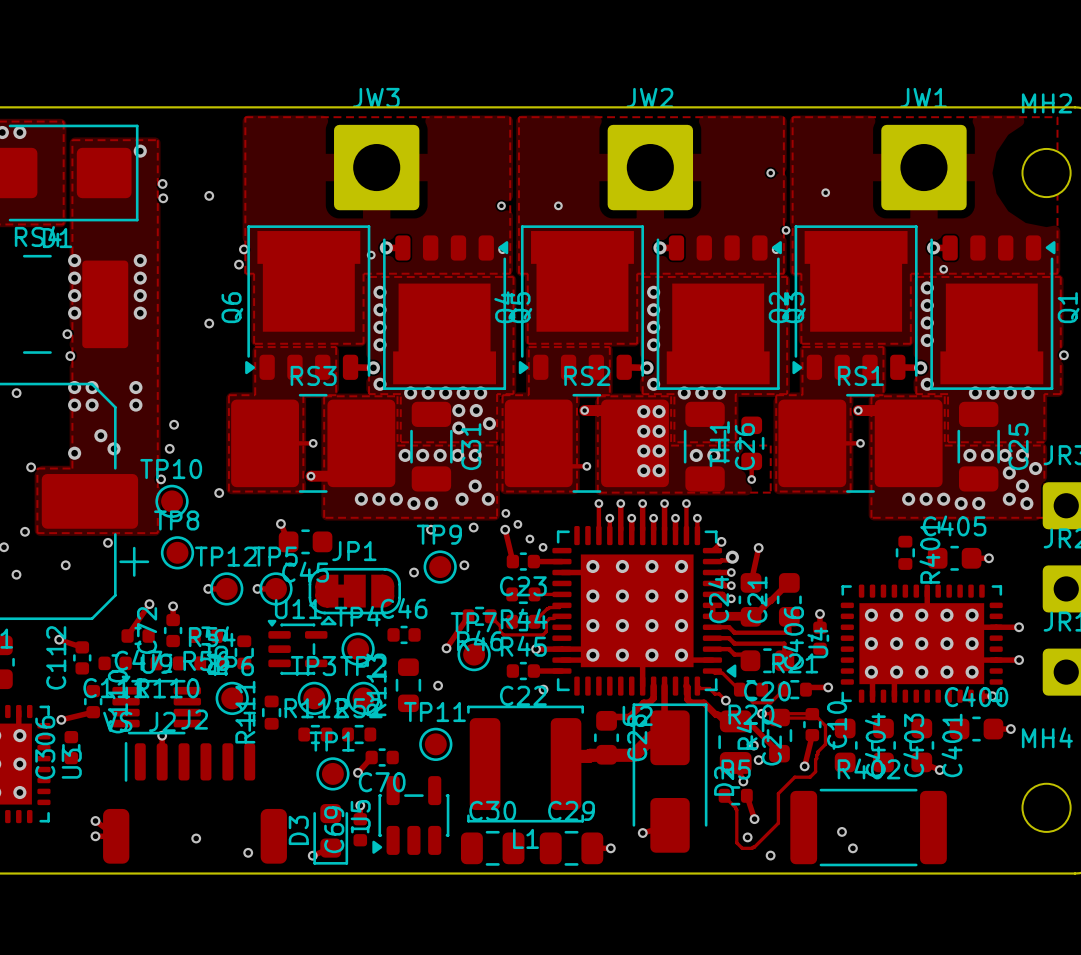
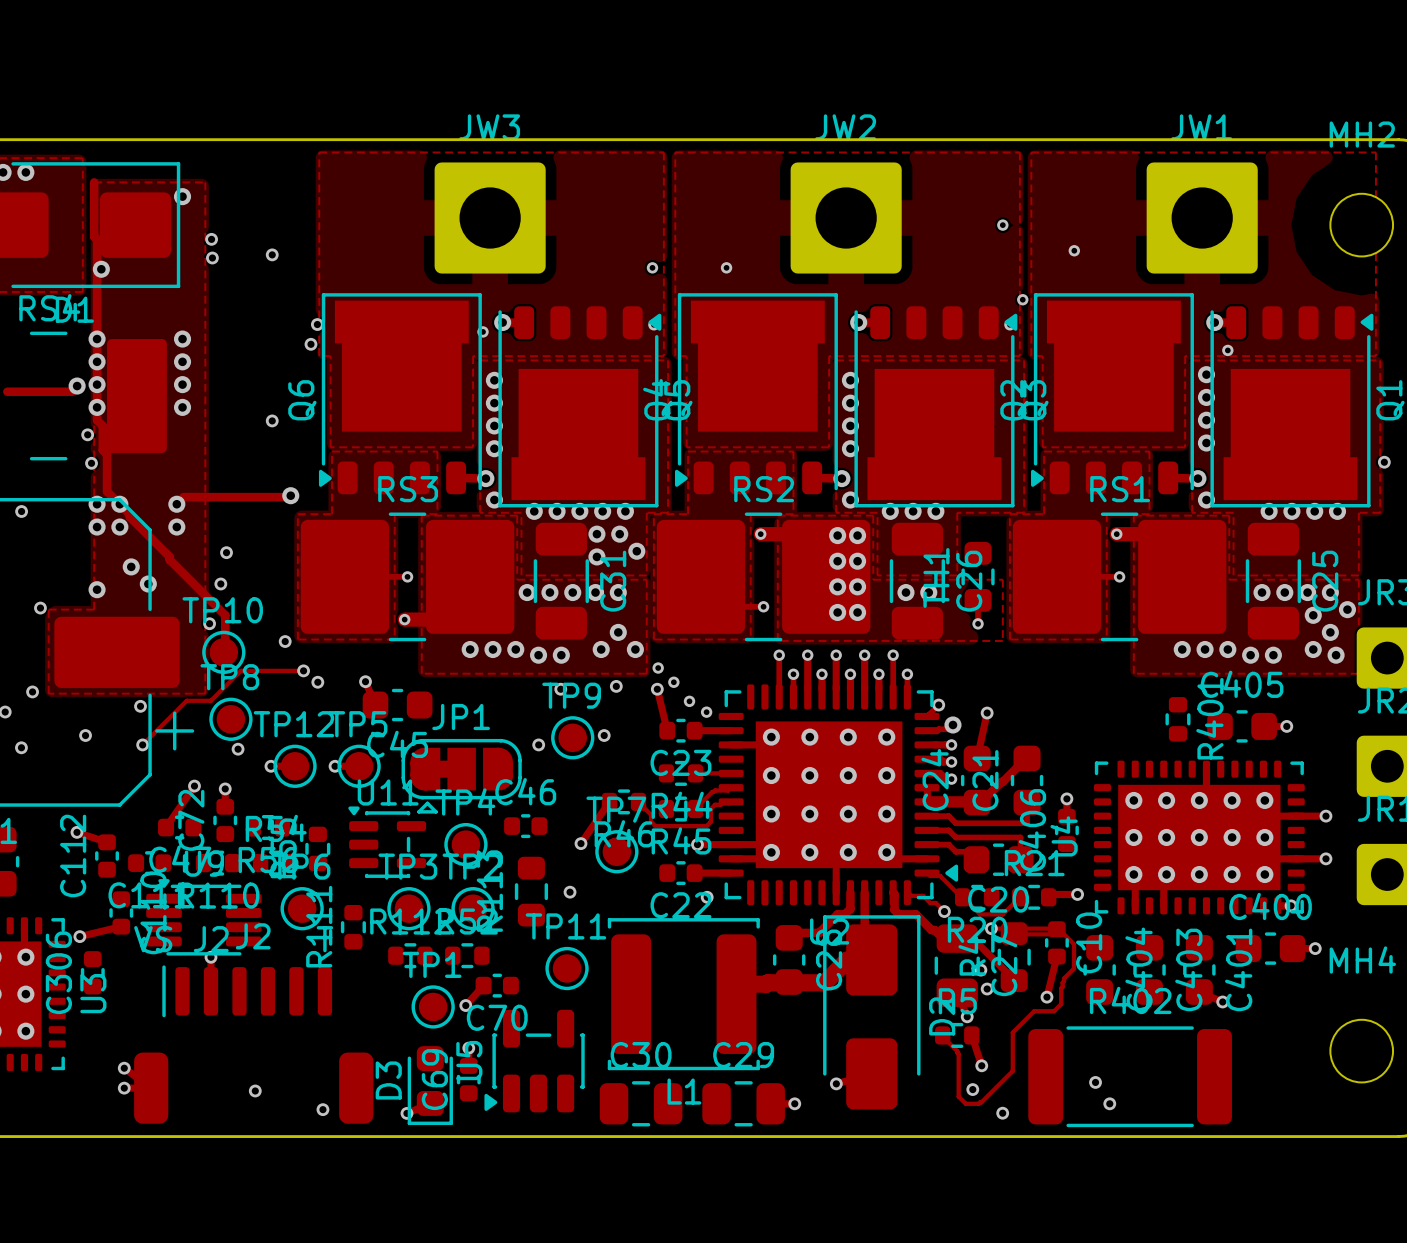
track: none -> (94, 182) (94, 236) (97, 239) (97, 420) (102, 425) (102, 450) (107, 454) (107, 491) (169, 556) (169, 559) (225, 615) (223, 652)
via: none -> (101, 269)
track: none -> (77, 386) (71, 391) (7, 391)
via: none -> (77, 386)
track: none -> (290, 495) (183, 497) (176, 504)
via: none -> (290, 495)
track: none -> (303, 670) (240, 670) (211, 700) (186, 700) (142, 744)
via: none -> (303, 670)
via: none -> (317, 682)
via: none -> (142, 744)
via: none -> (238, 749)

